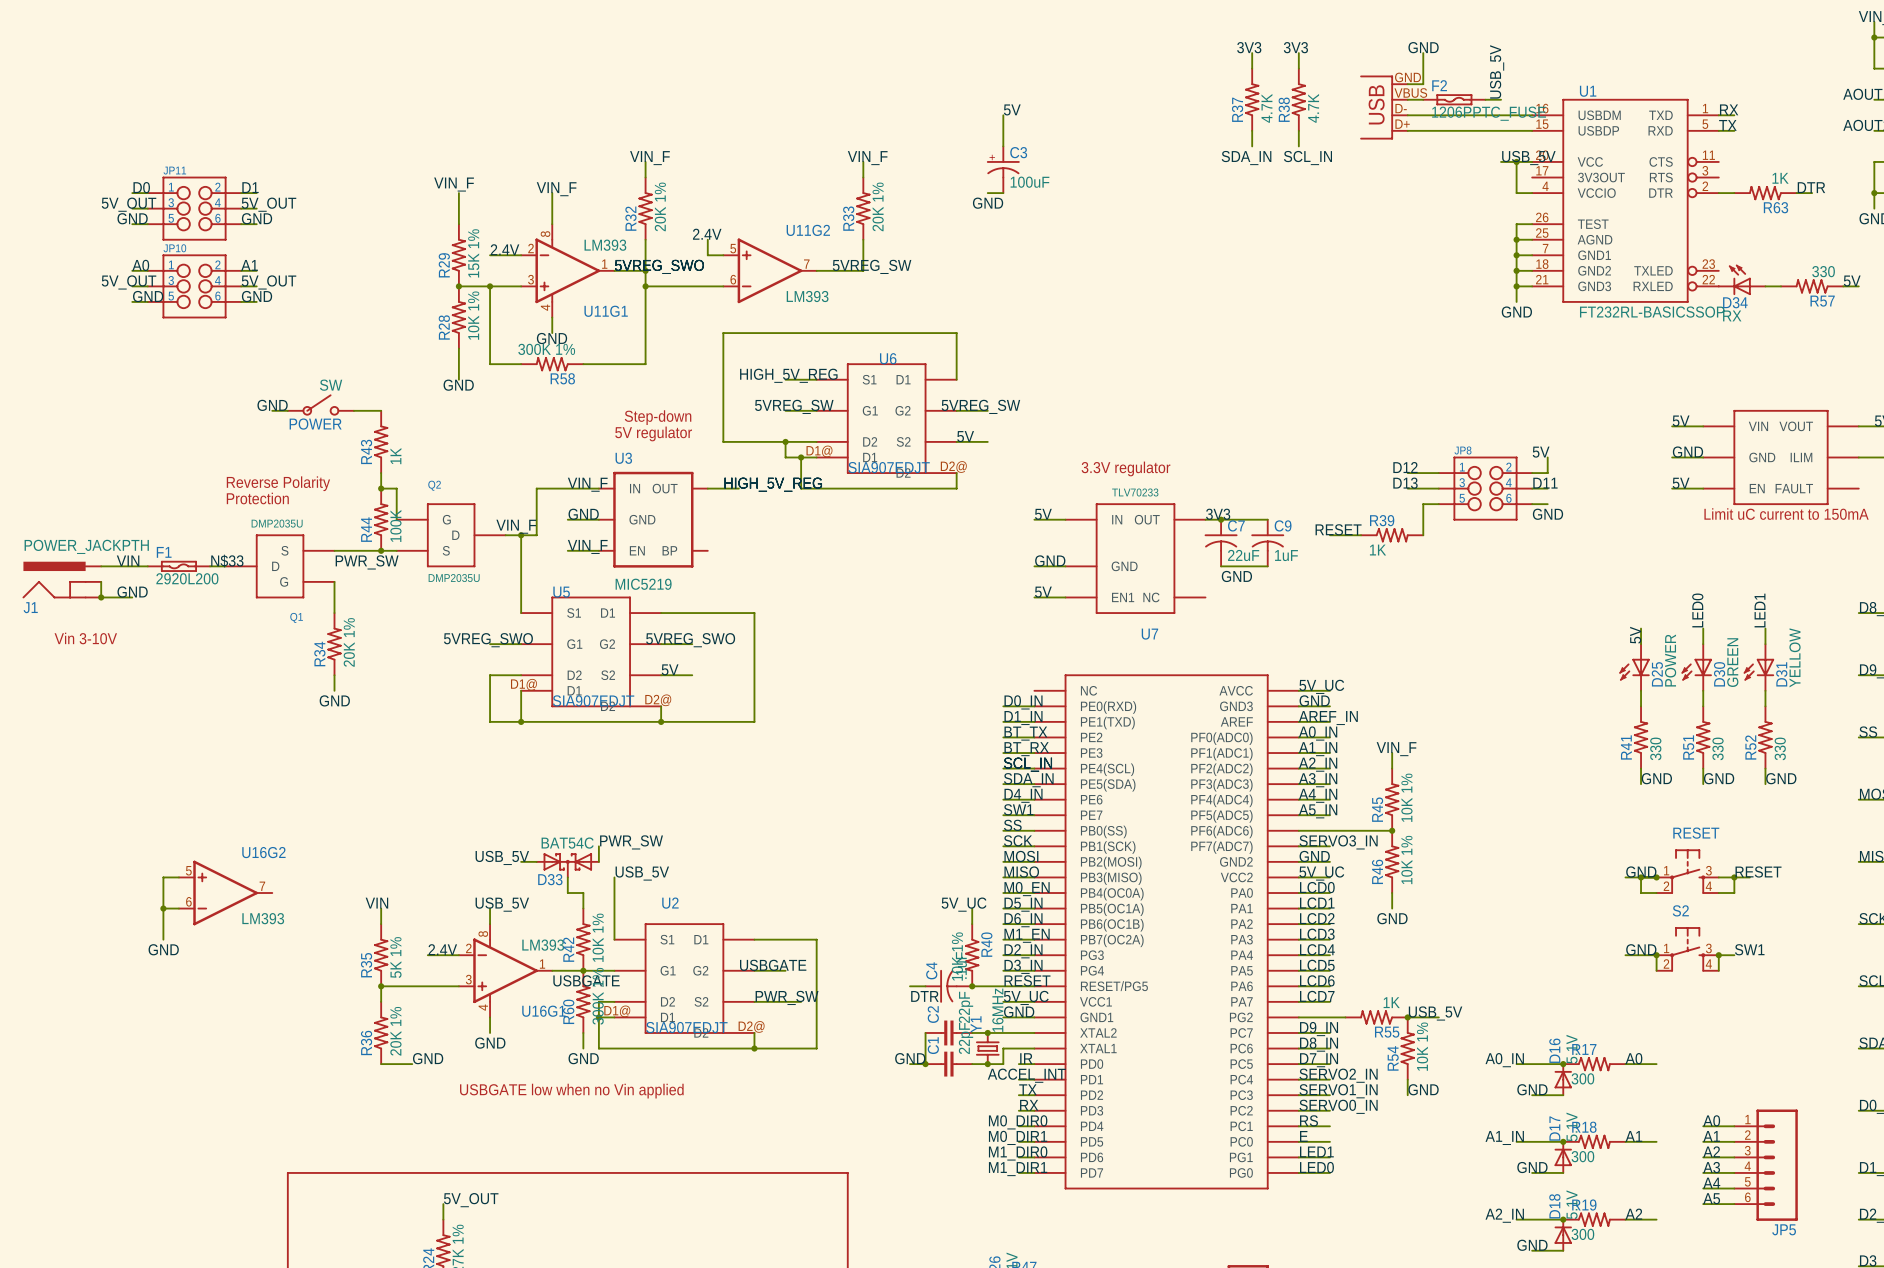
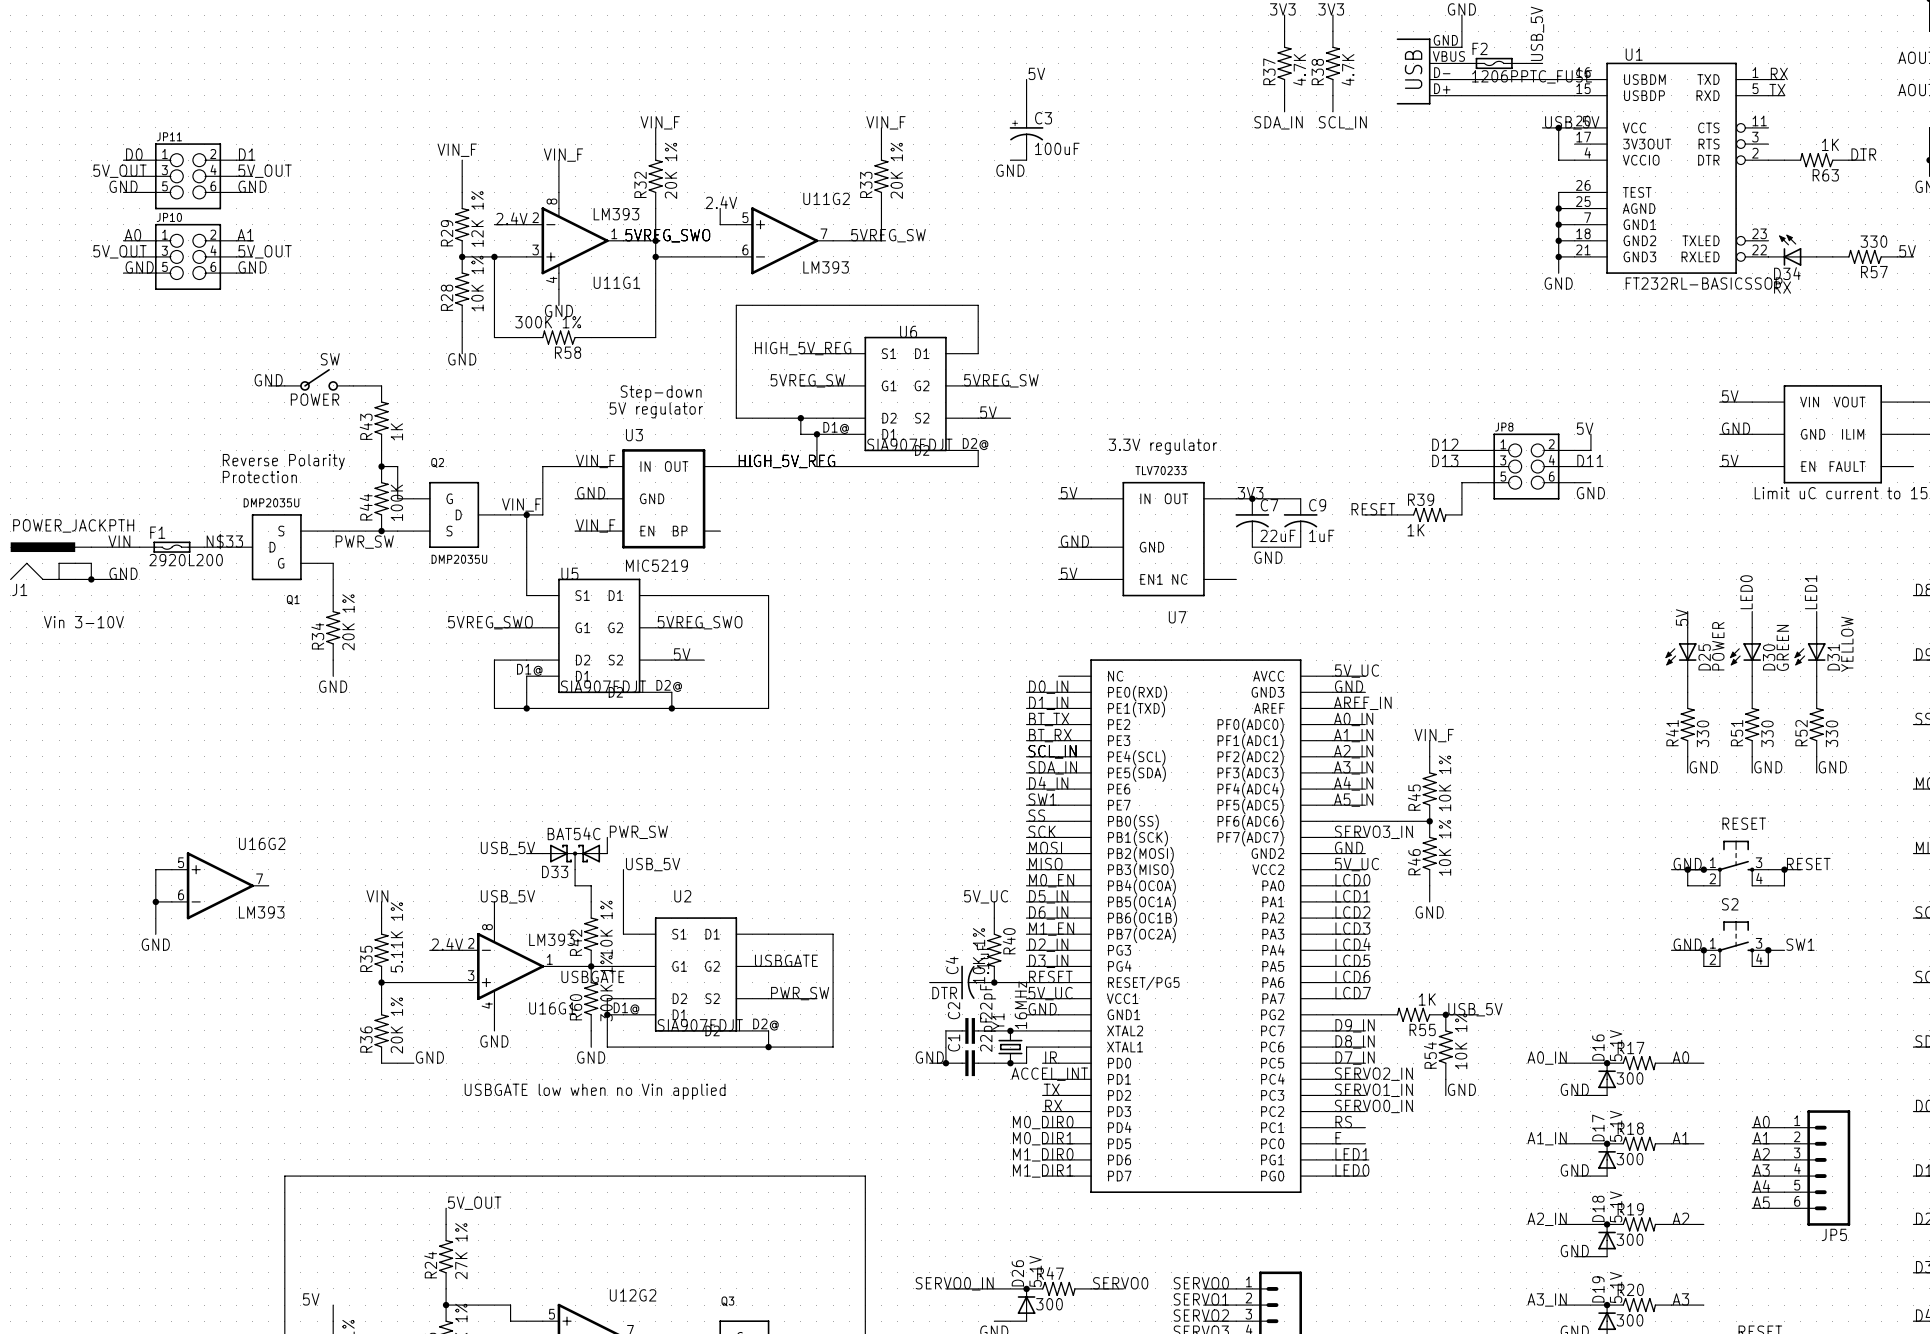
R29 value: 15K 1% (473, 253) -> 12K 1% (477, 219)
R35 value: 5K 1% (395, 957) -> 5.11K 1% (396, 937)

